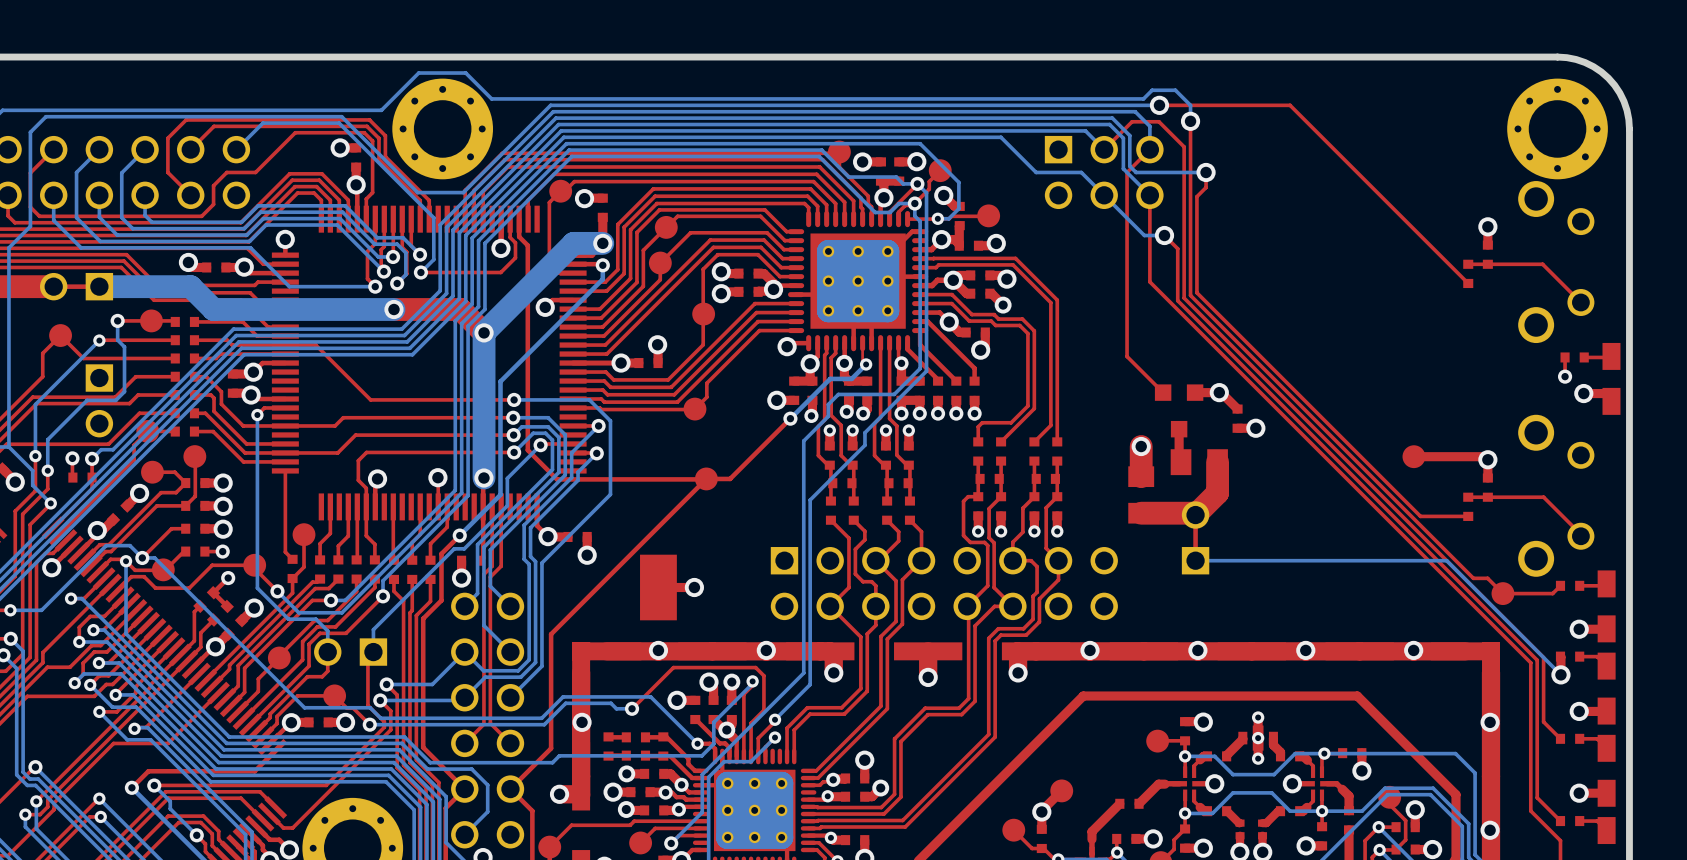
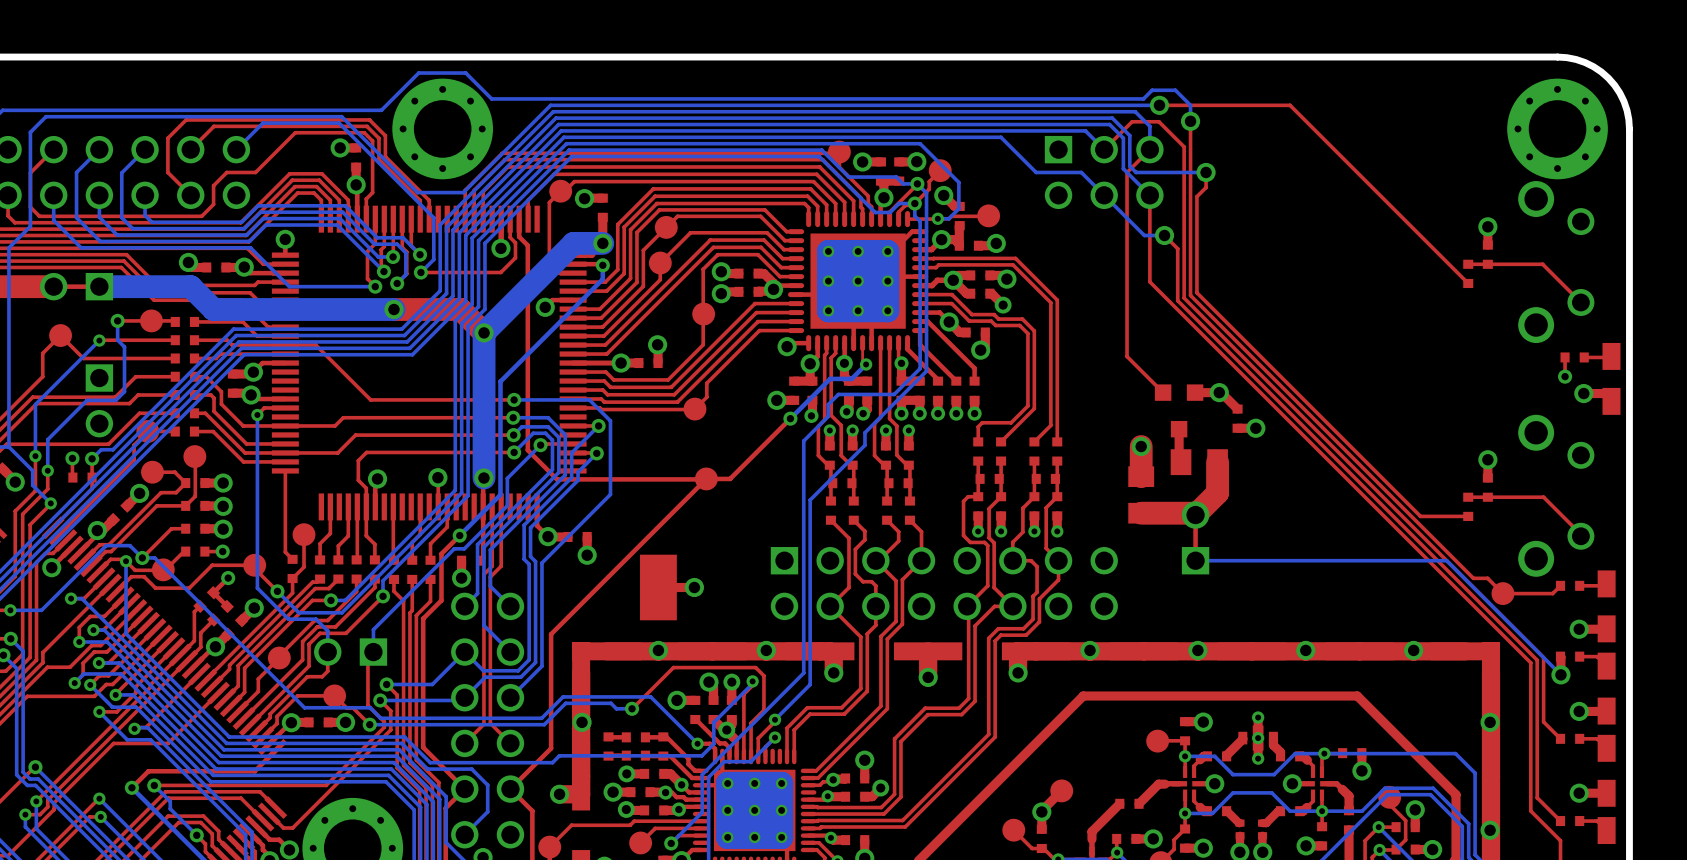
top track: (1413, 456) (1484, 456) (1487, 459) -> none
part: (1413, 456) -> none

